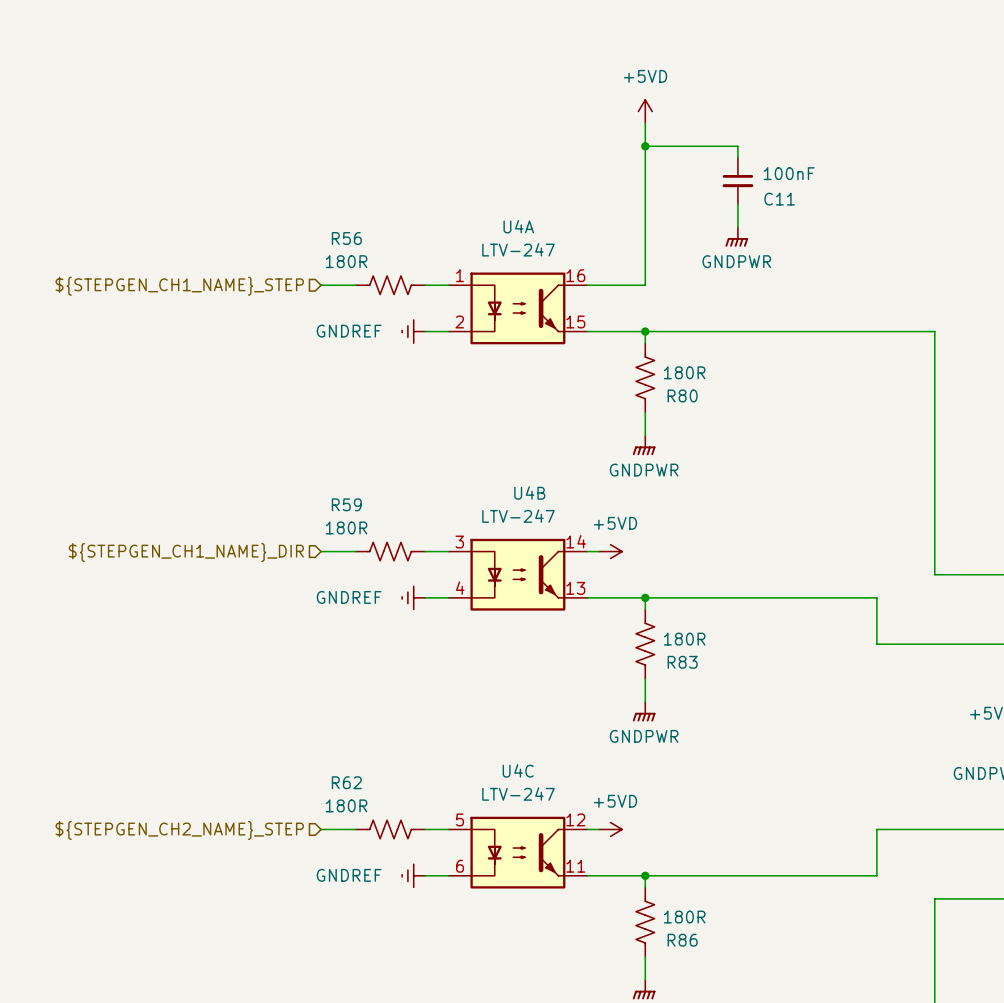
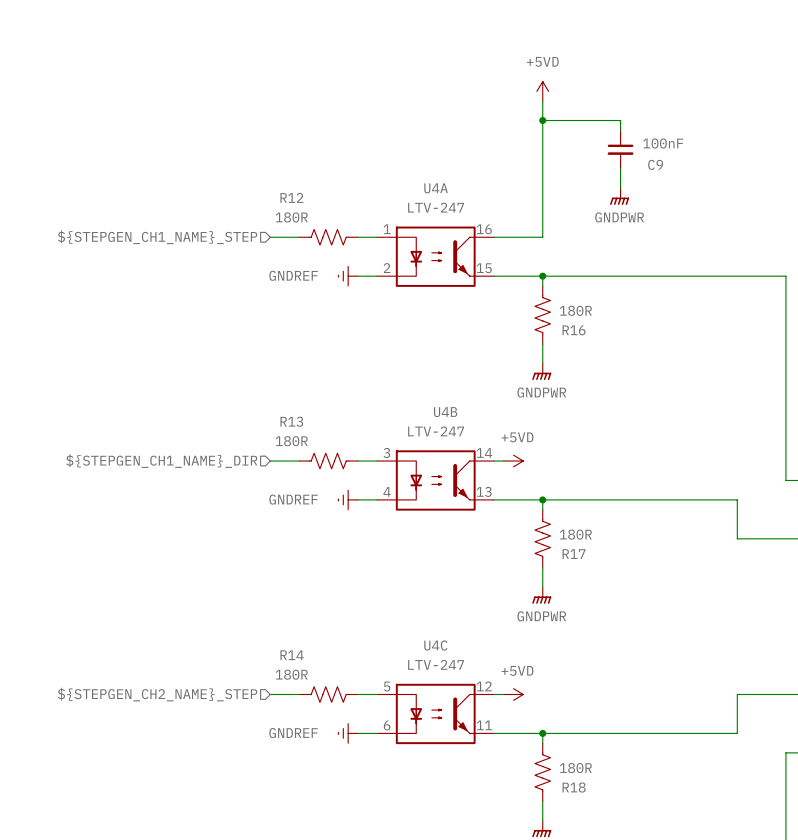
C11 name: C11 (779, 199) -> C9 (655, 164)
R56 name: R56 (346, 238) -> R12 (291, 197)
R80 name: R80 (682, 395) -> R16 (574, 330)
R59 name: R59 (346, 504) -> R13 (291, 421)
R83 name: R83 (682, 662) -> R17 (574, 554)
R62 name: R62 (346, 782) -> R14 (292, 655)
R86 name: R86 (682, 940) -> R18 (574, 787)

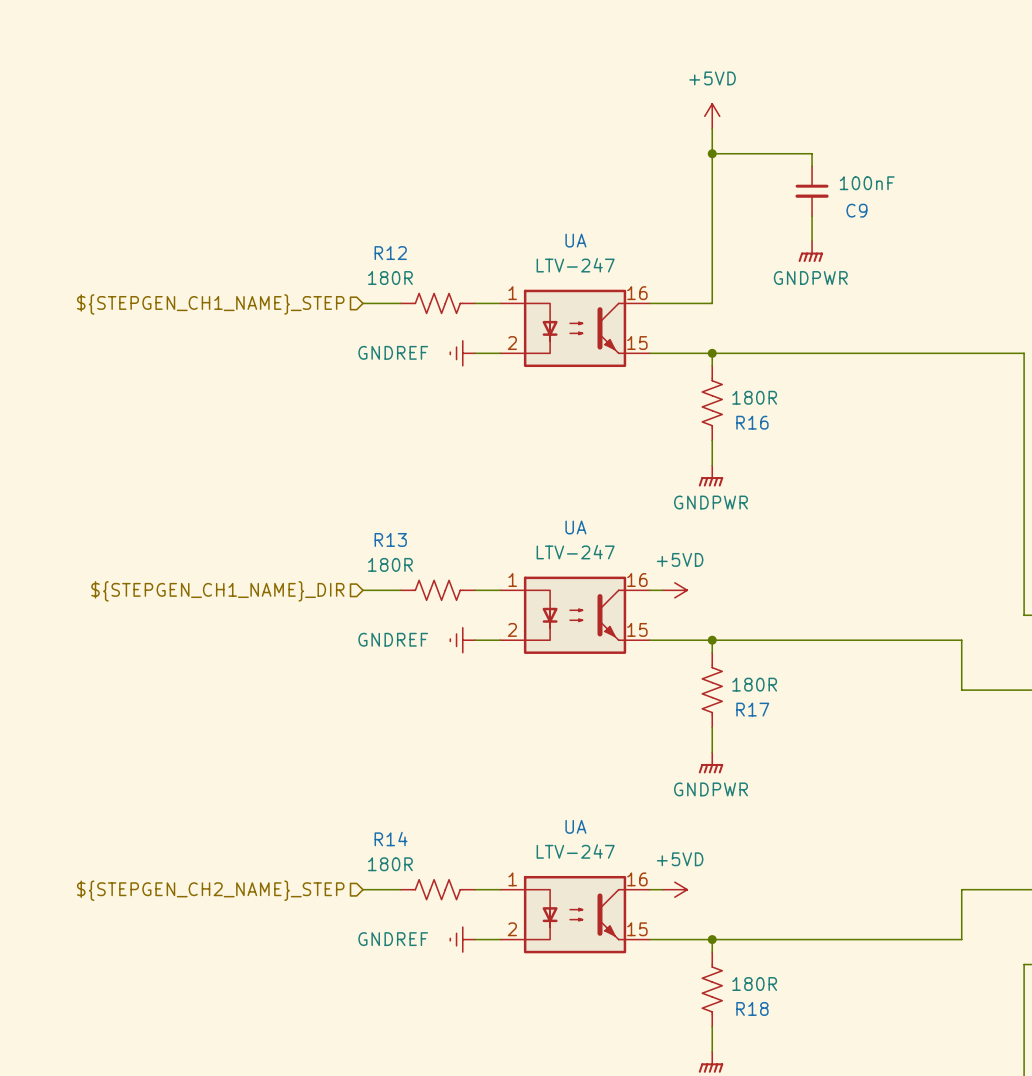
U4A name: U4A (436, 188) -> UA (575, 240)
U4B name: U4B (445, 412) -> UA (575, 527)
U4B pin number: 3 (386, 452) -> 1 (512, 580)
U4B pin number: 14 (484, 452) -> 16 (637, 580)
U4B pin number: 4 (387, 491) -> 2 (512, 629)
U4B pin number: 13 (484, 491) -> 15 (637, 629)
U4C name: U4C (435, 645) -> UA (575, 826)
U4C pin number: 5 (387, 686) -> 1 (512, 879)
U4C pin number: 12 (484, 686) -> 16 (637, 879)
U4C pin number: 6 (387, 725) -> 2 (512, 929)
U4C pin number: 11 (484, 725) -> 15 (637, 929)

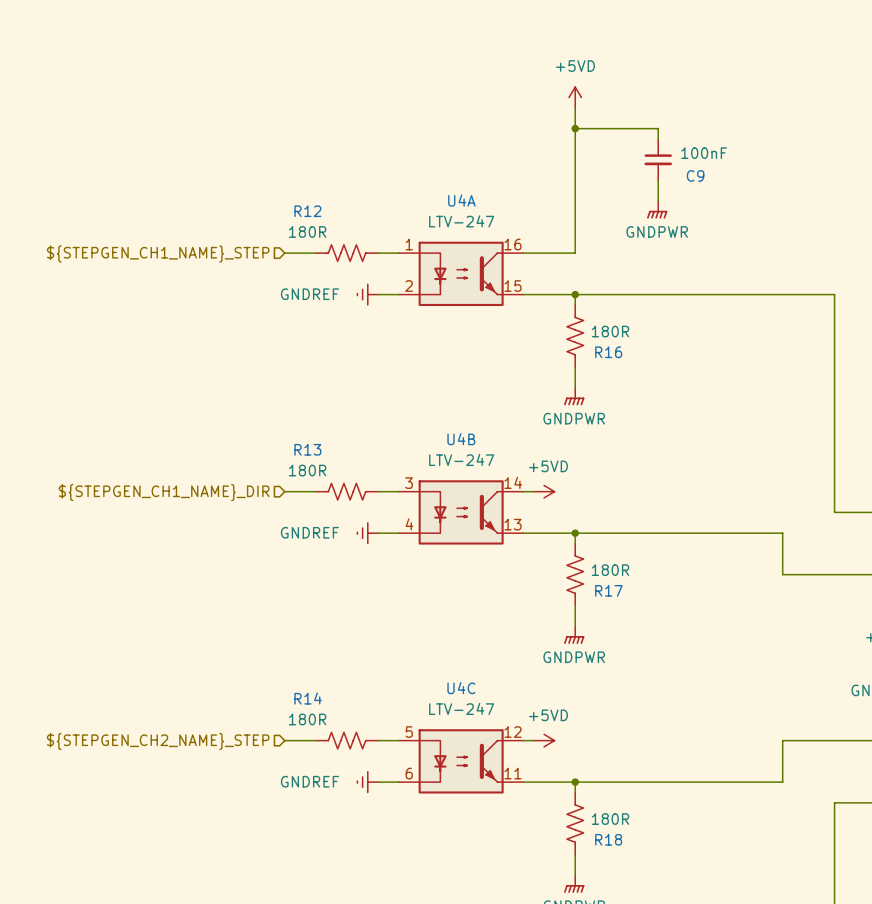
UA name: UA (575, 240) -> U4A (461, 200)
UA name: UA (575, 527) -> U4B (461, 439)
UA pin number: 1 (512, 580) -> 3 (409, 483)
UA pin number: 16 (637, 580) -> 14 (513, 482)
UA pin number: 2 (512, 629) -> 4 (409, 524)
UA pin number: 15 (637, 629) -> 13 (513, 524)
UA name: UA (575, 826) -> U4C (461, 688)
UA pin number: 1 (512, 879) -> 5 (409, 732)
UA pin number: 16 (637, 879) -> 12 (513, 732)
UA pin number: 2 (512, 929) -> 6 (409, 773)
UA pin number: 15 (637, 929) -> 11 (513, 773)

